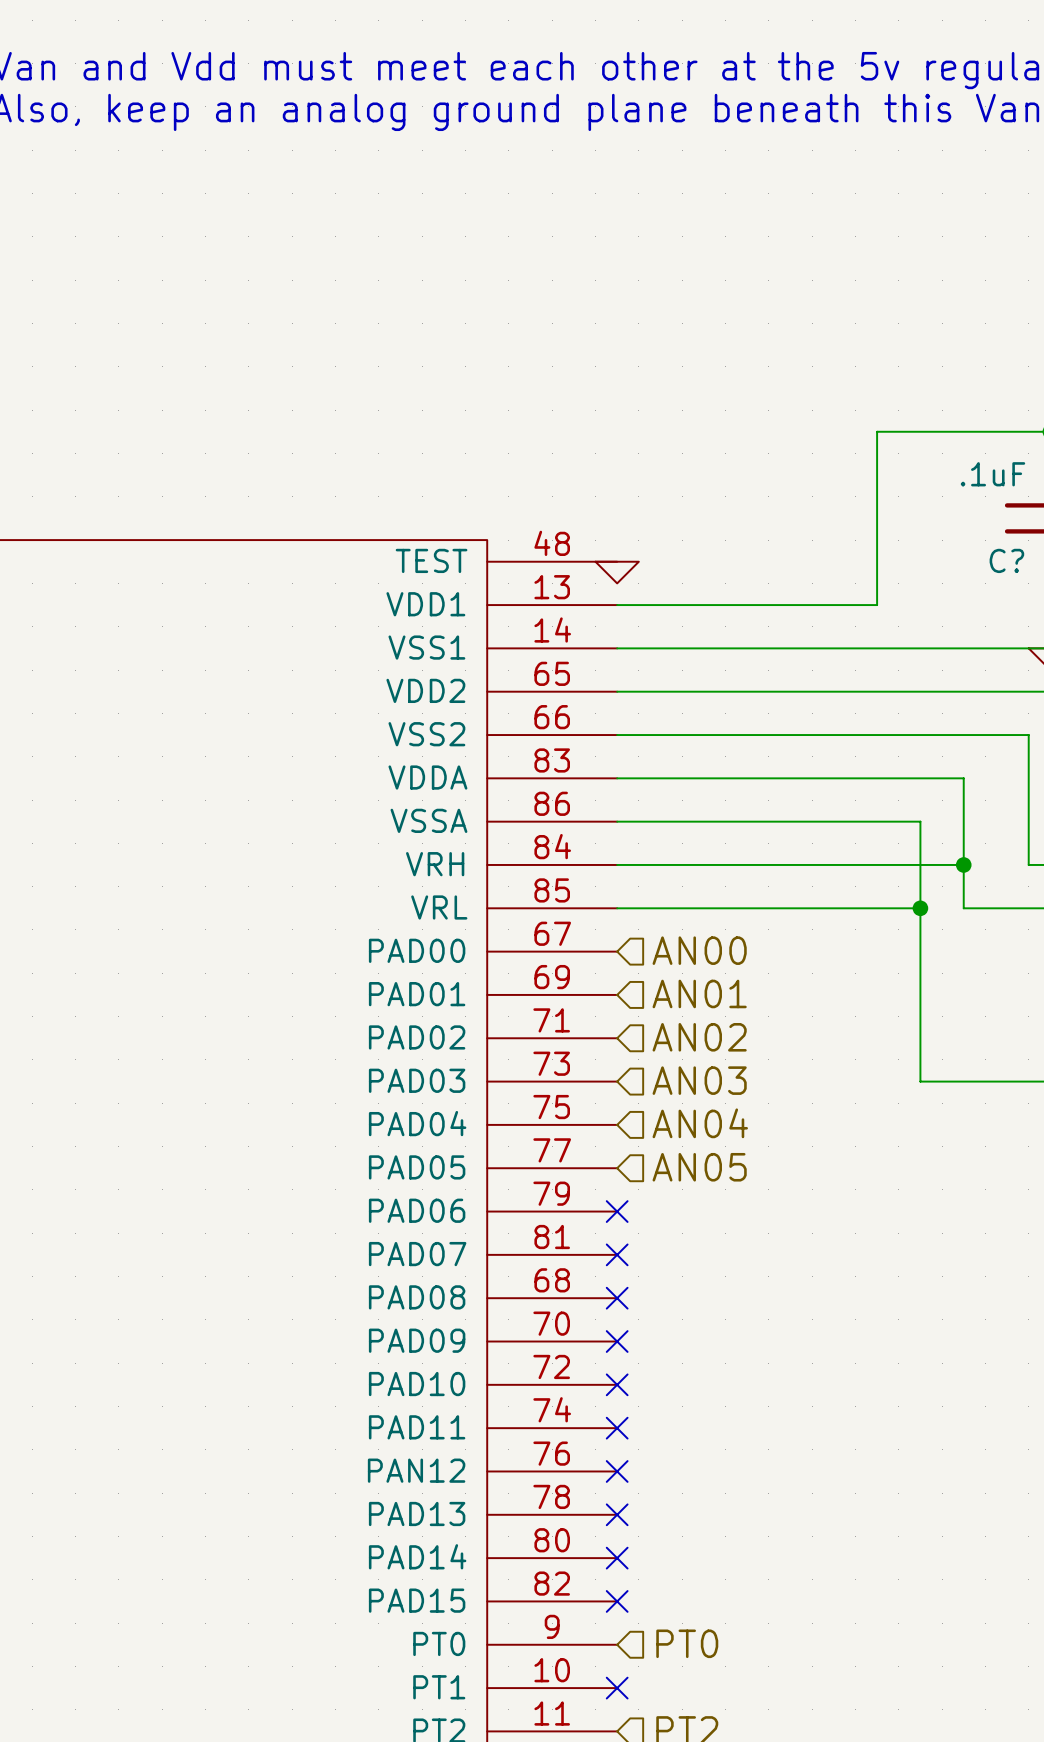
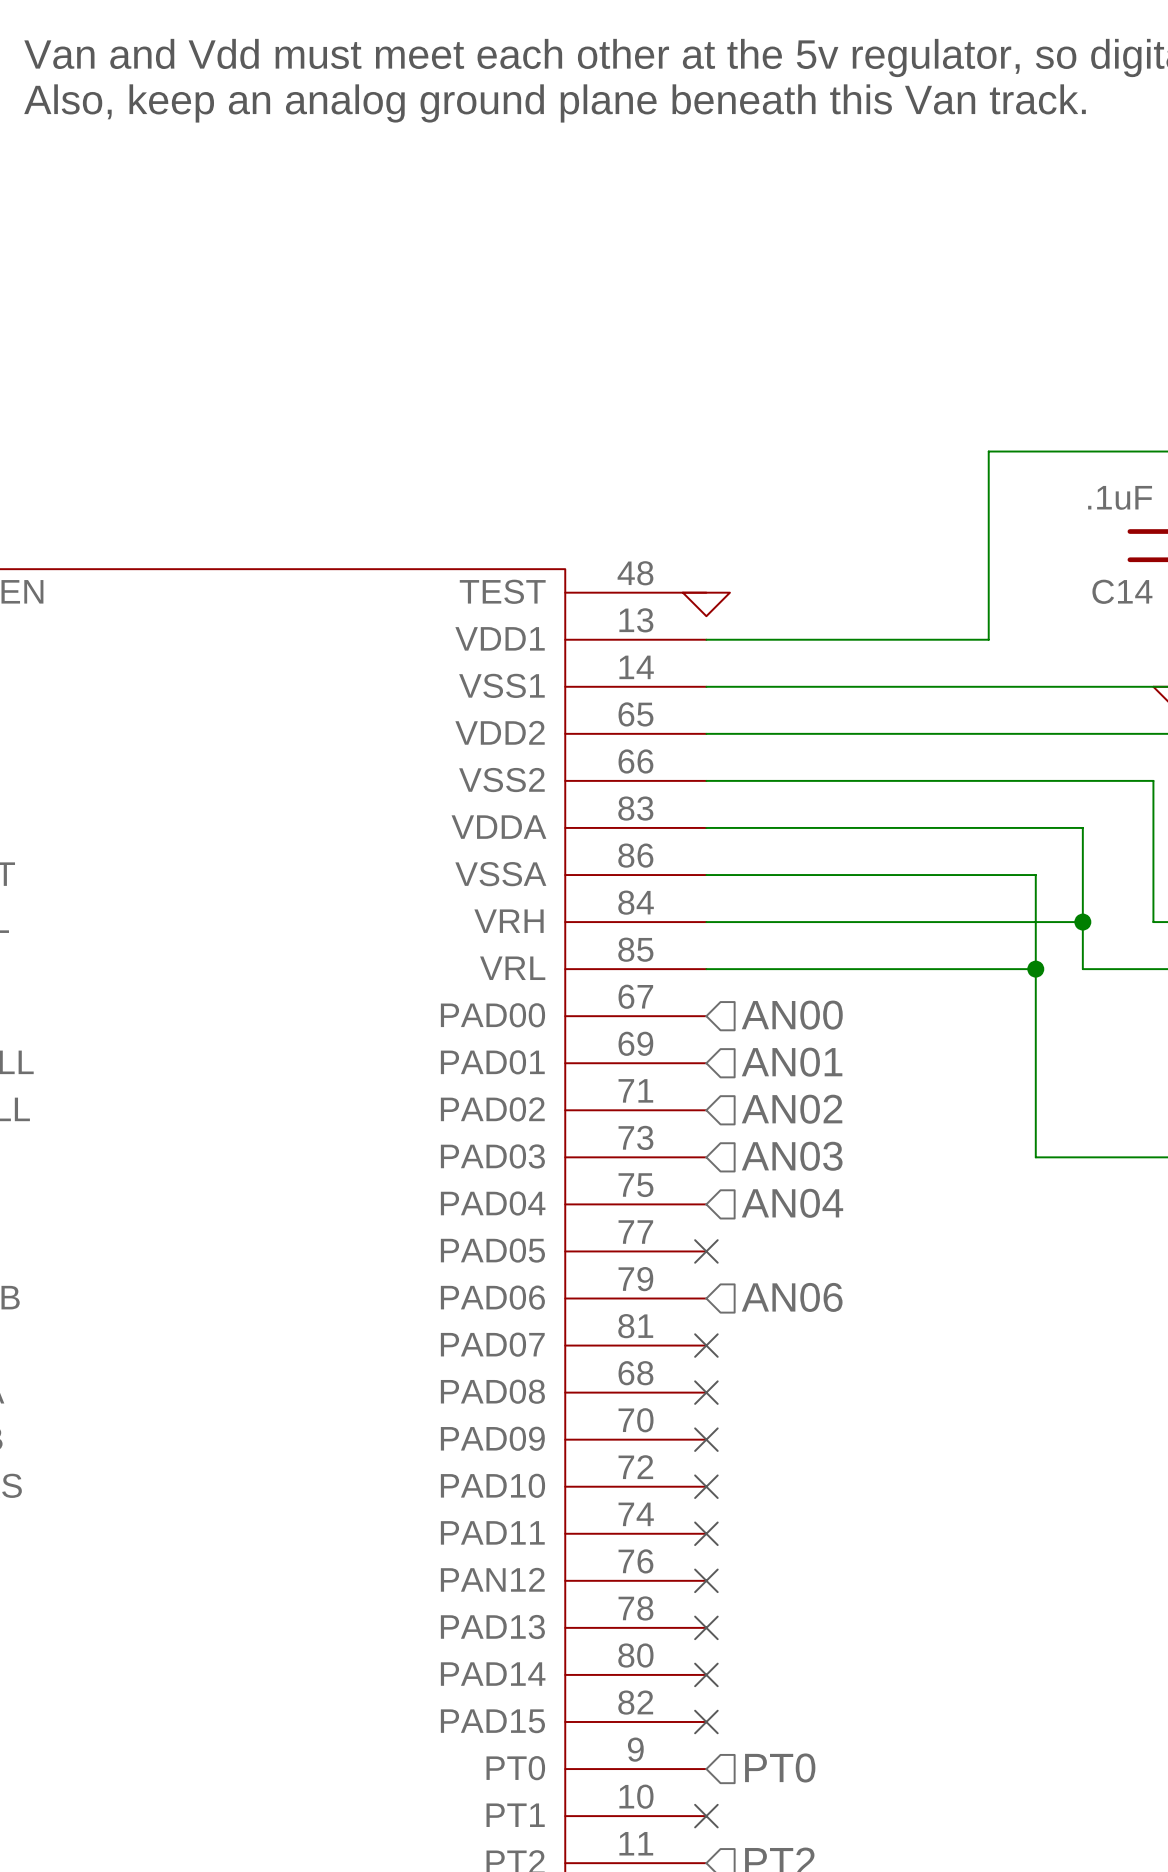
C? name: C? (1006, 560) -> C14 (1122, 591)
hierarchical label: AN05 (699, 1167) -> AN06 (792, 1297)
no-connect mark position: (617, 1211) -> (706, 1251)

